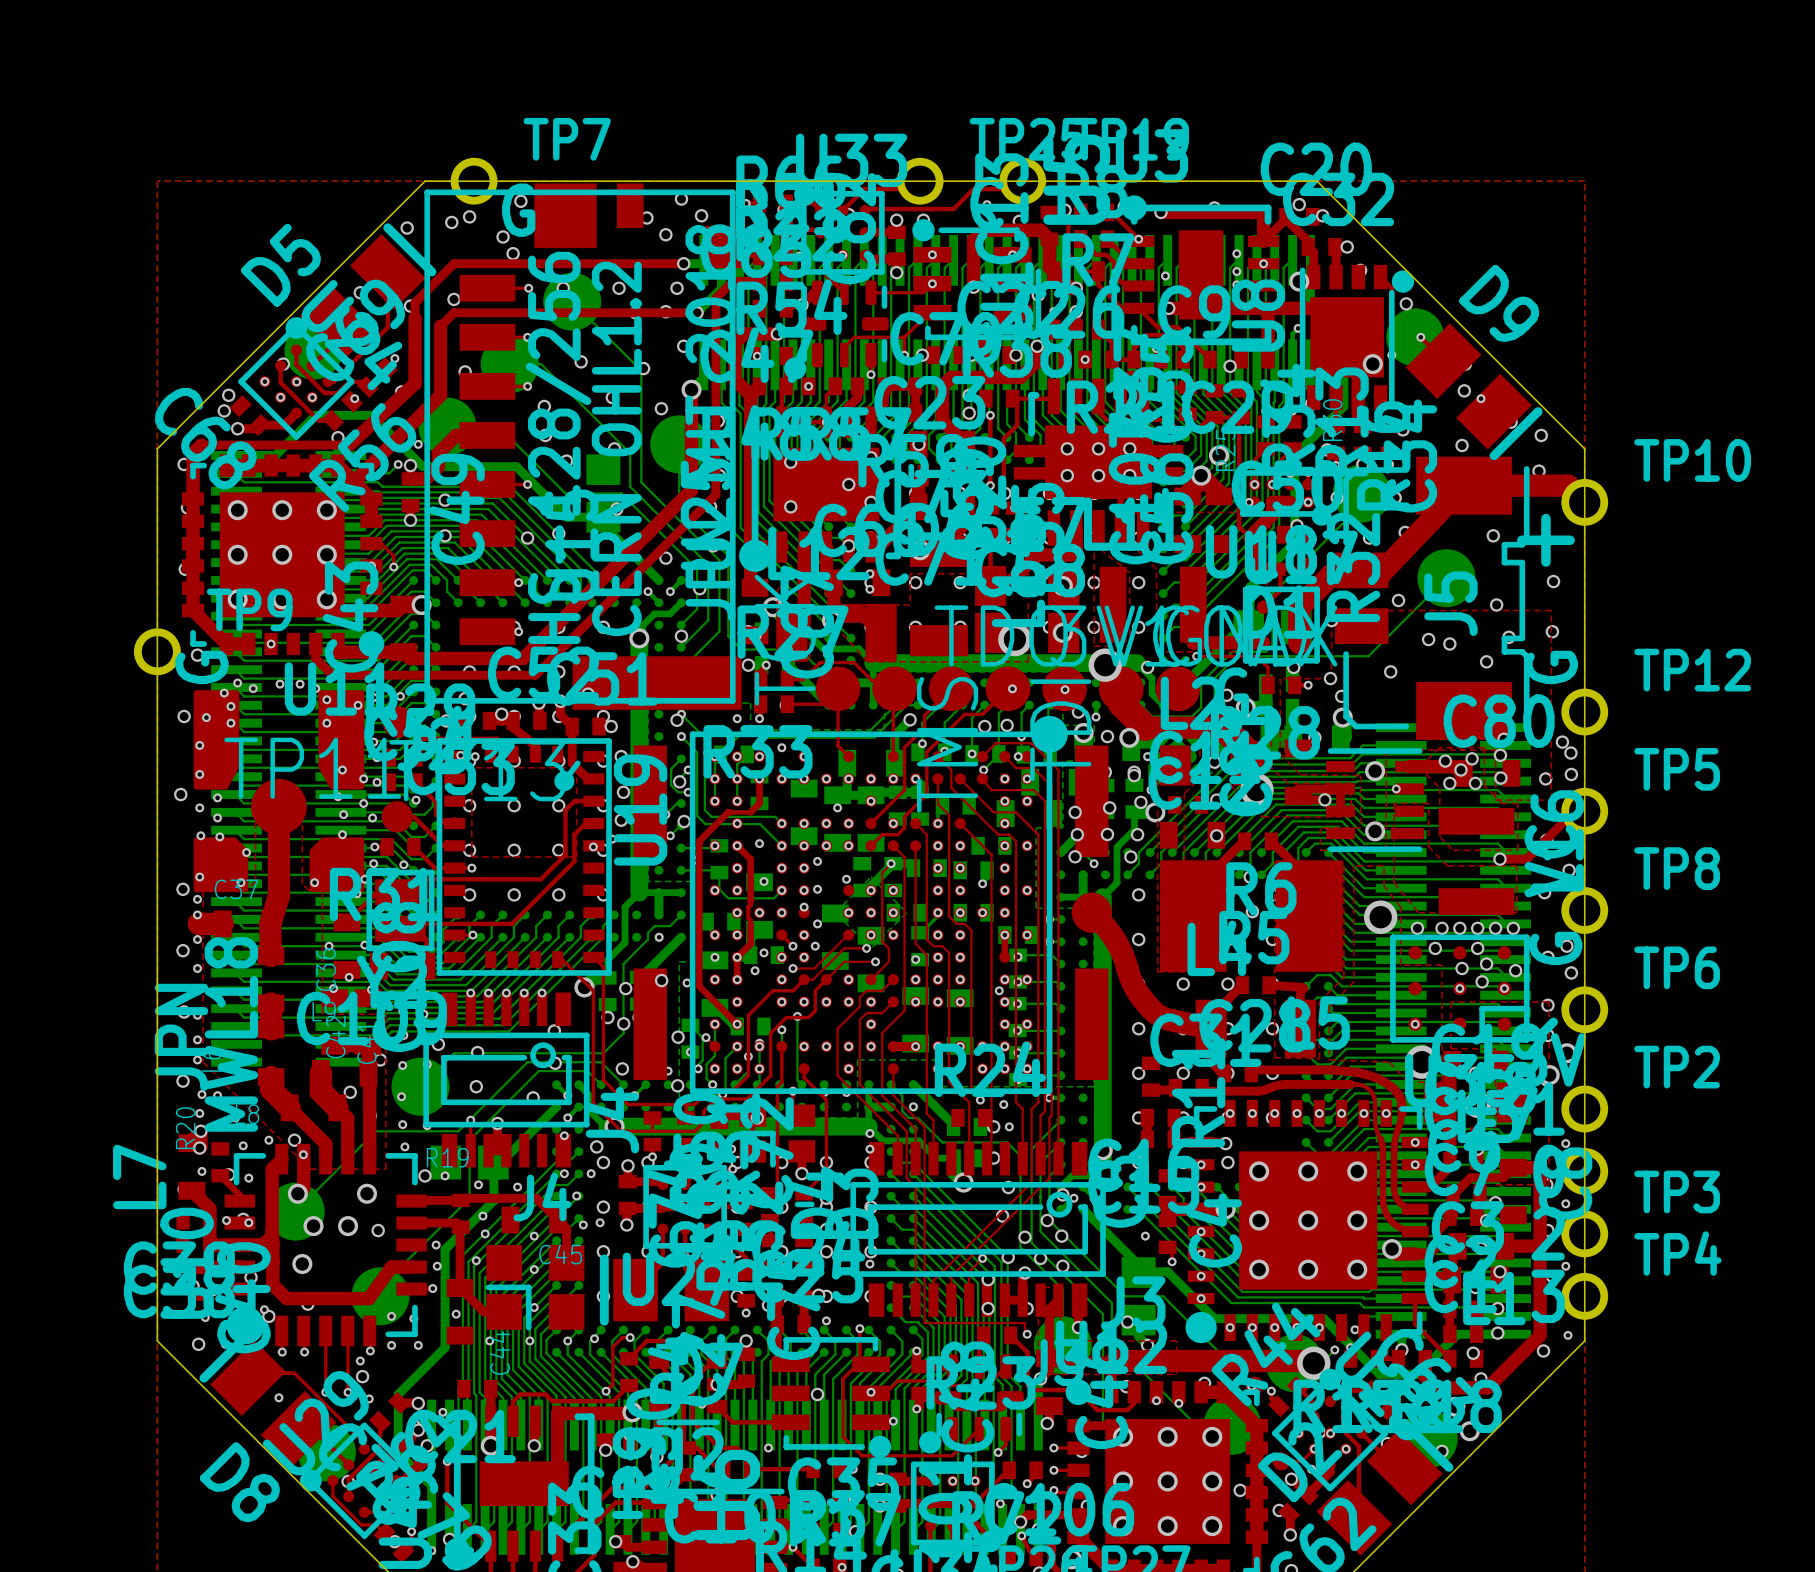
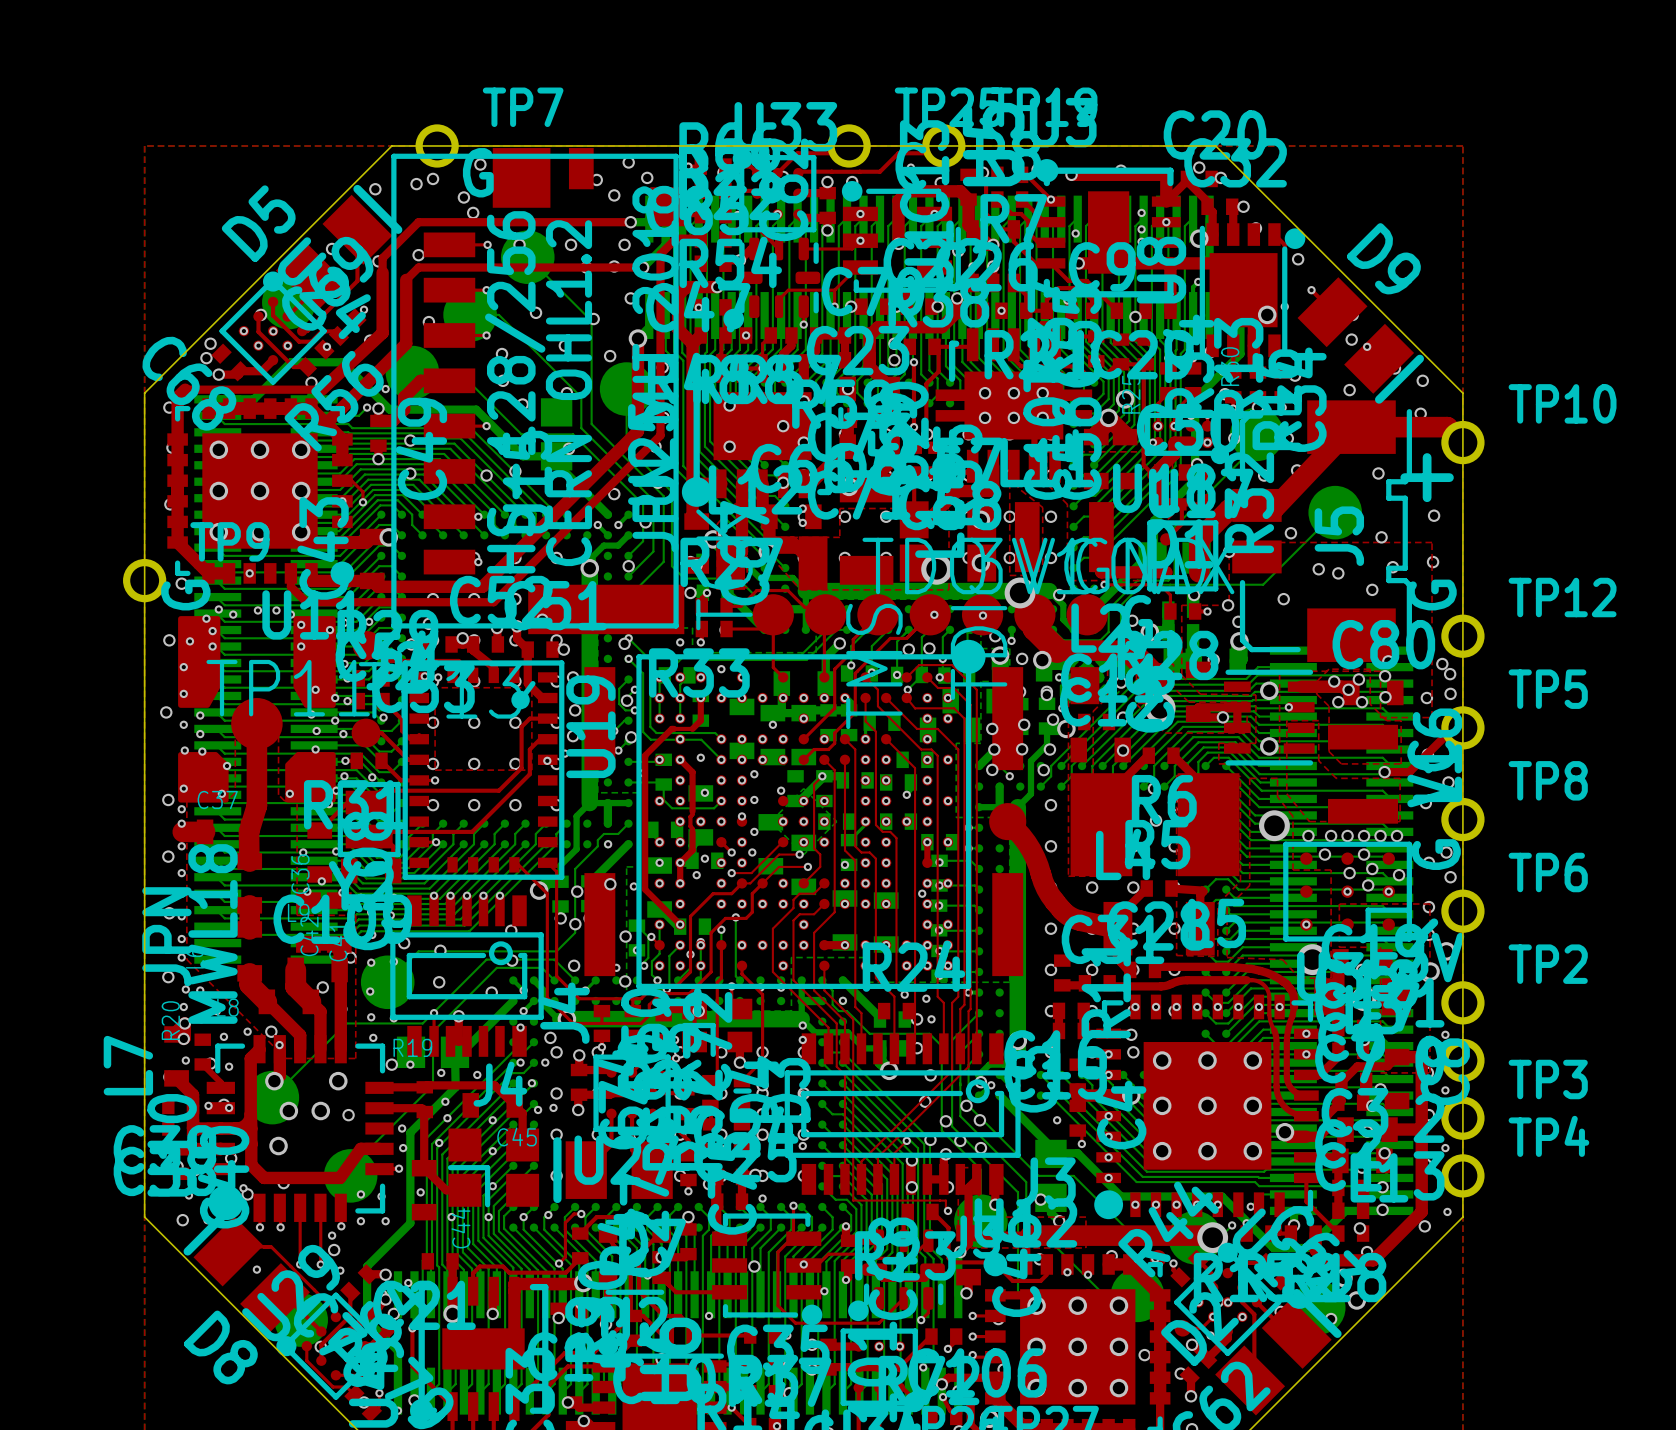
part: (1415, 337) -> none

